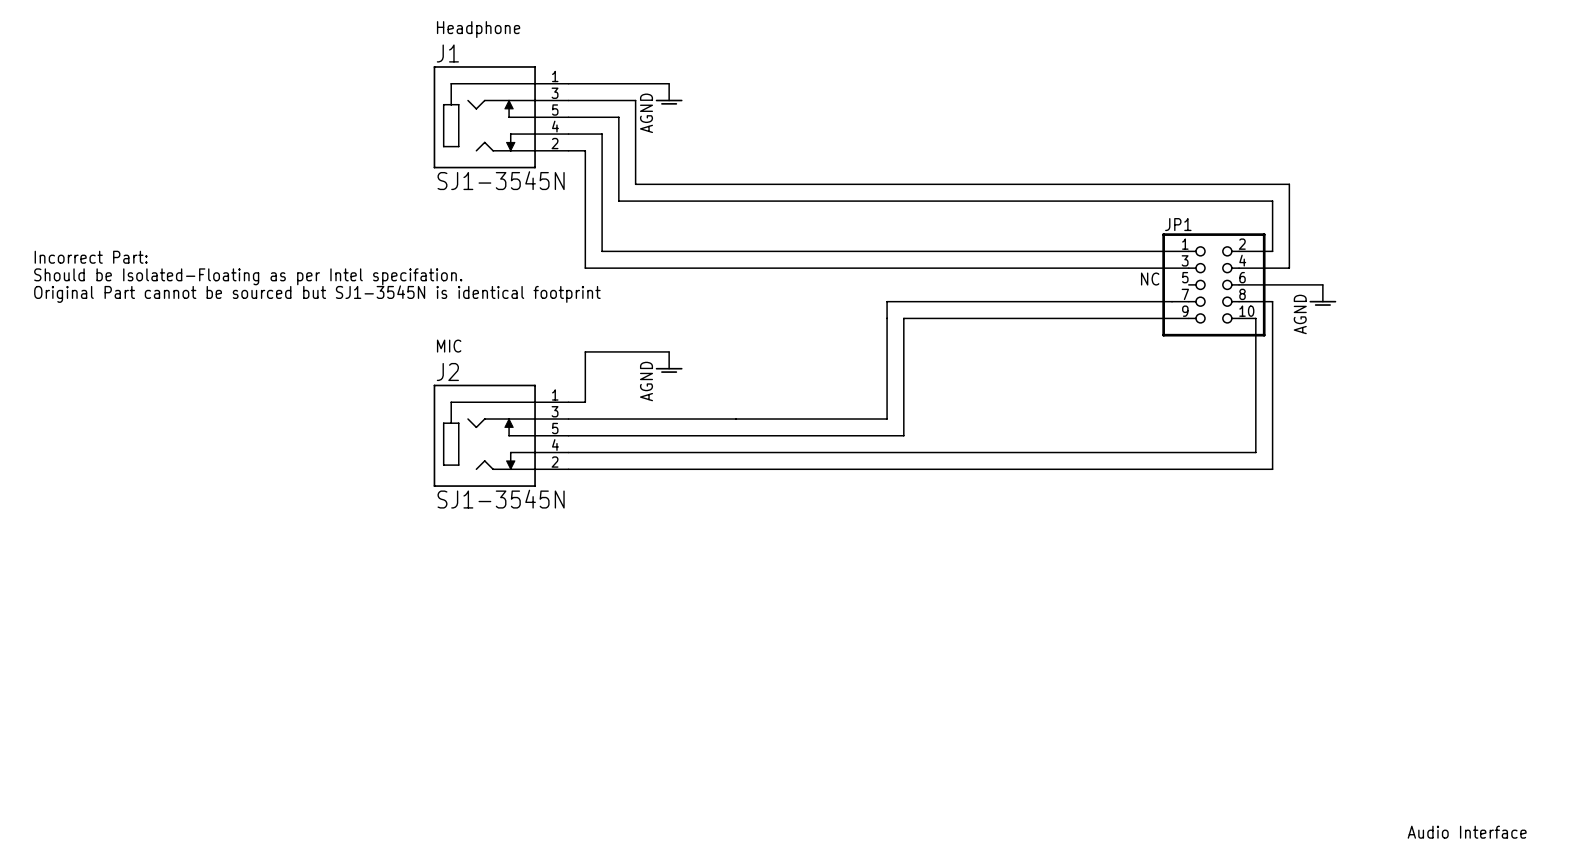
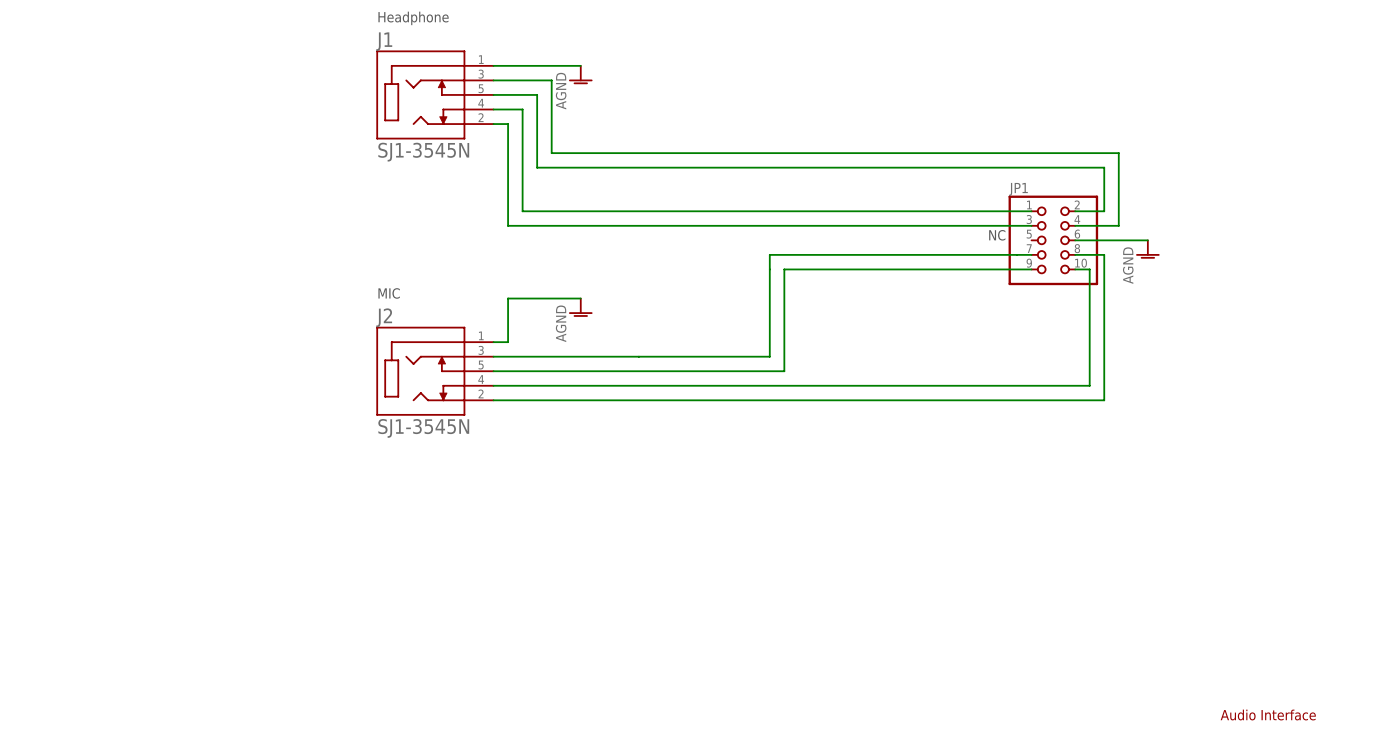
text: Incorrect Part: (91, 257) -> none
text: Should be Isolated-Floating as per Intel specifation. (248, 276) -> none
text: Original Part cannot be sourced but SJ1-3545N is identical footprint (317, 294) -> none

